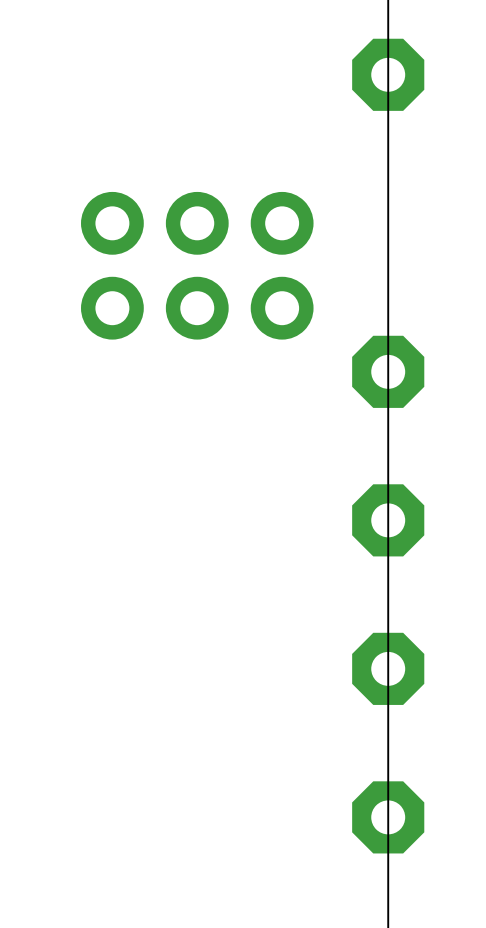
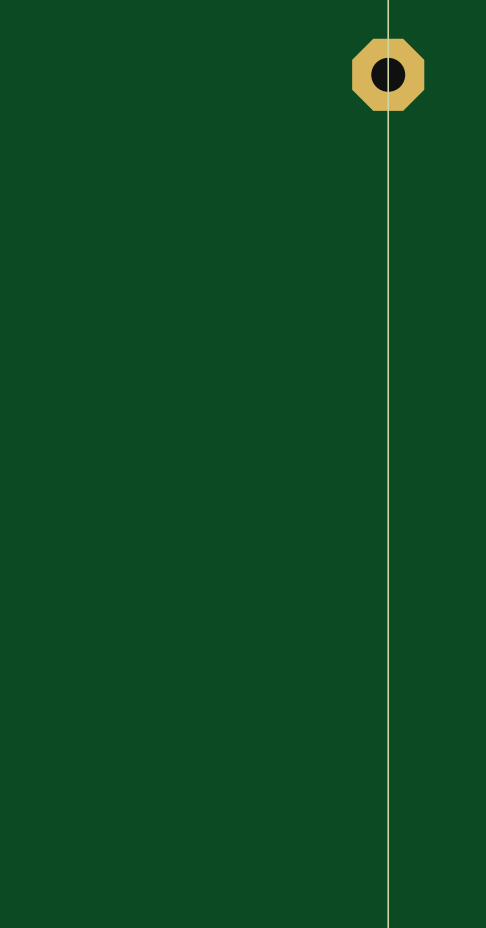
part: (197, 265) -> none
part: (388, 371) -> none
part: (388, 520) -> none
part: (388, 668) -> none
part: (388, 817) -> none

